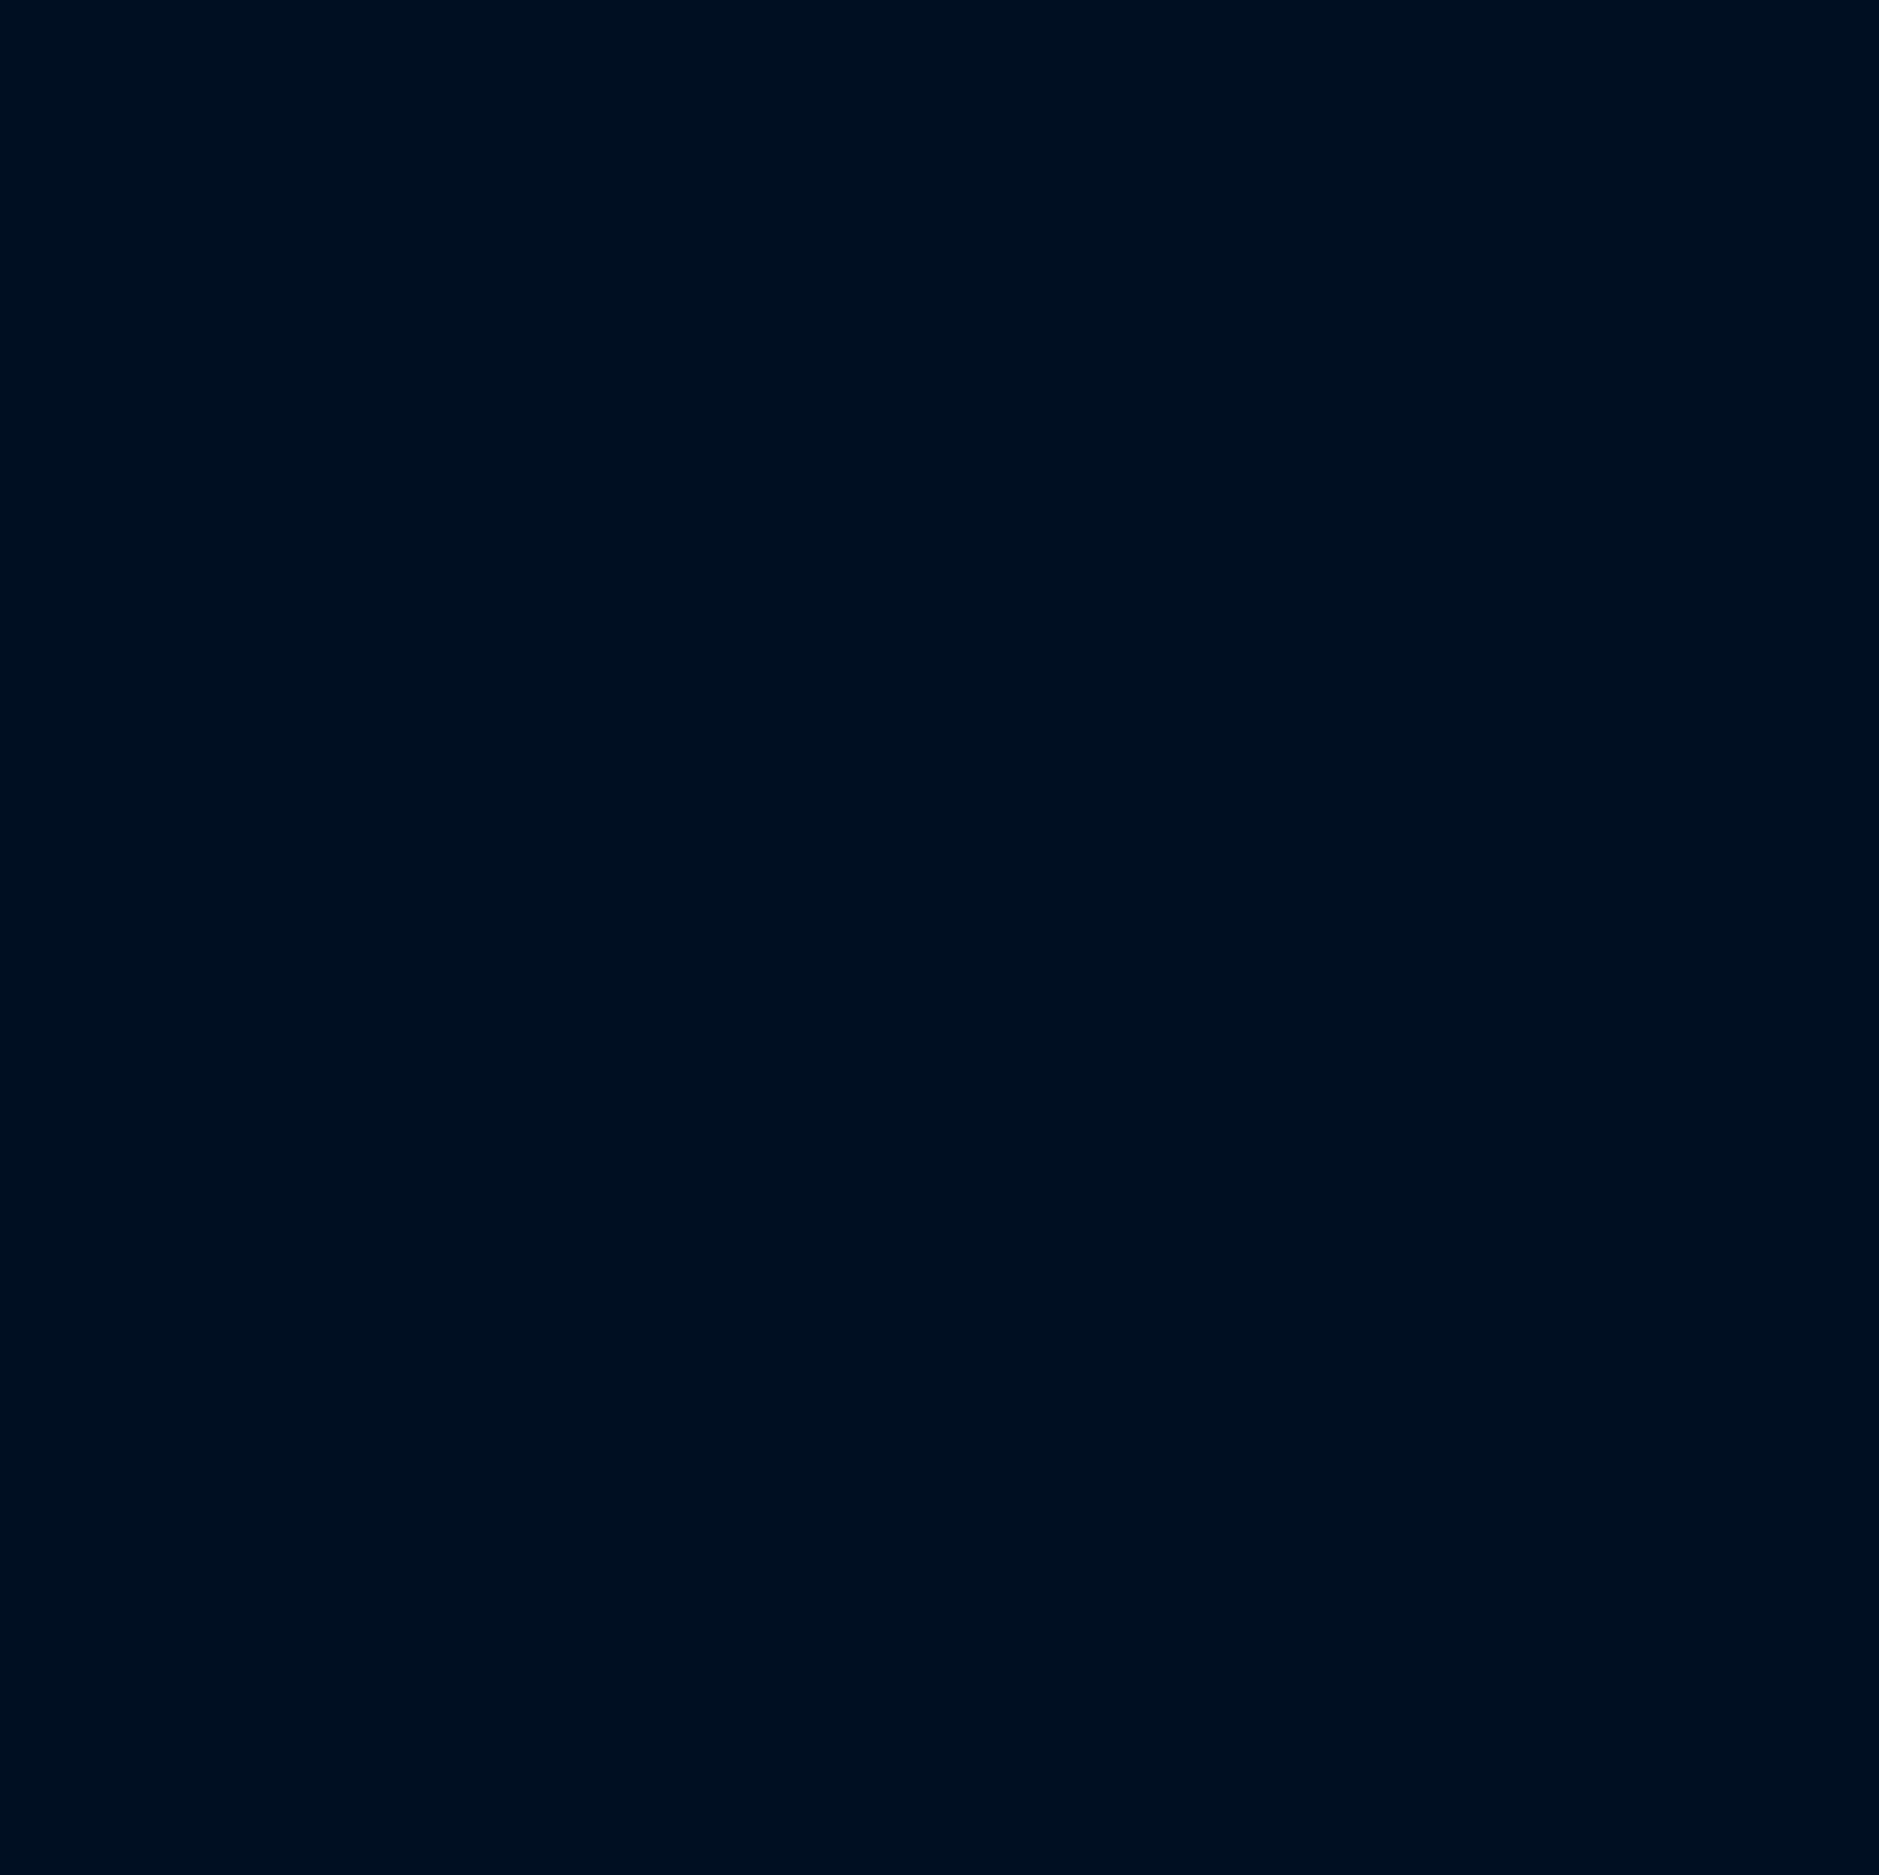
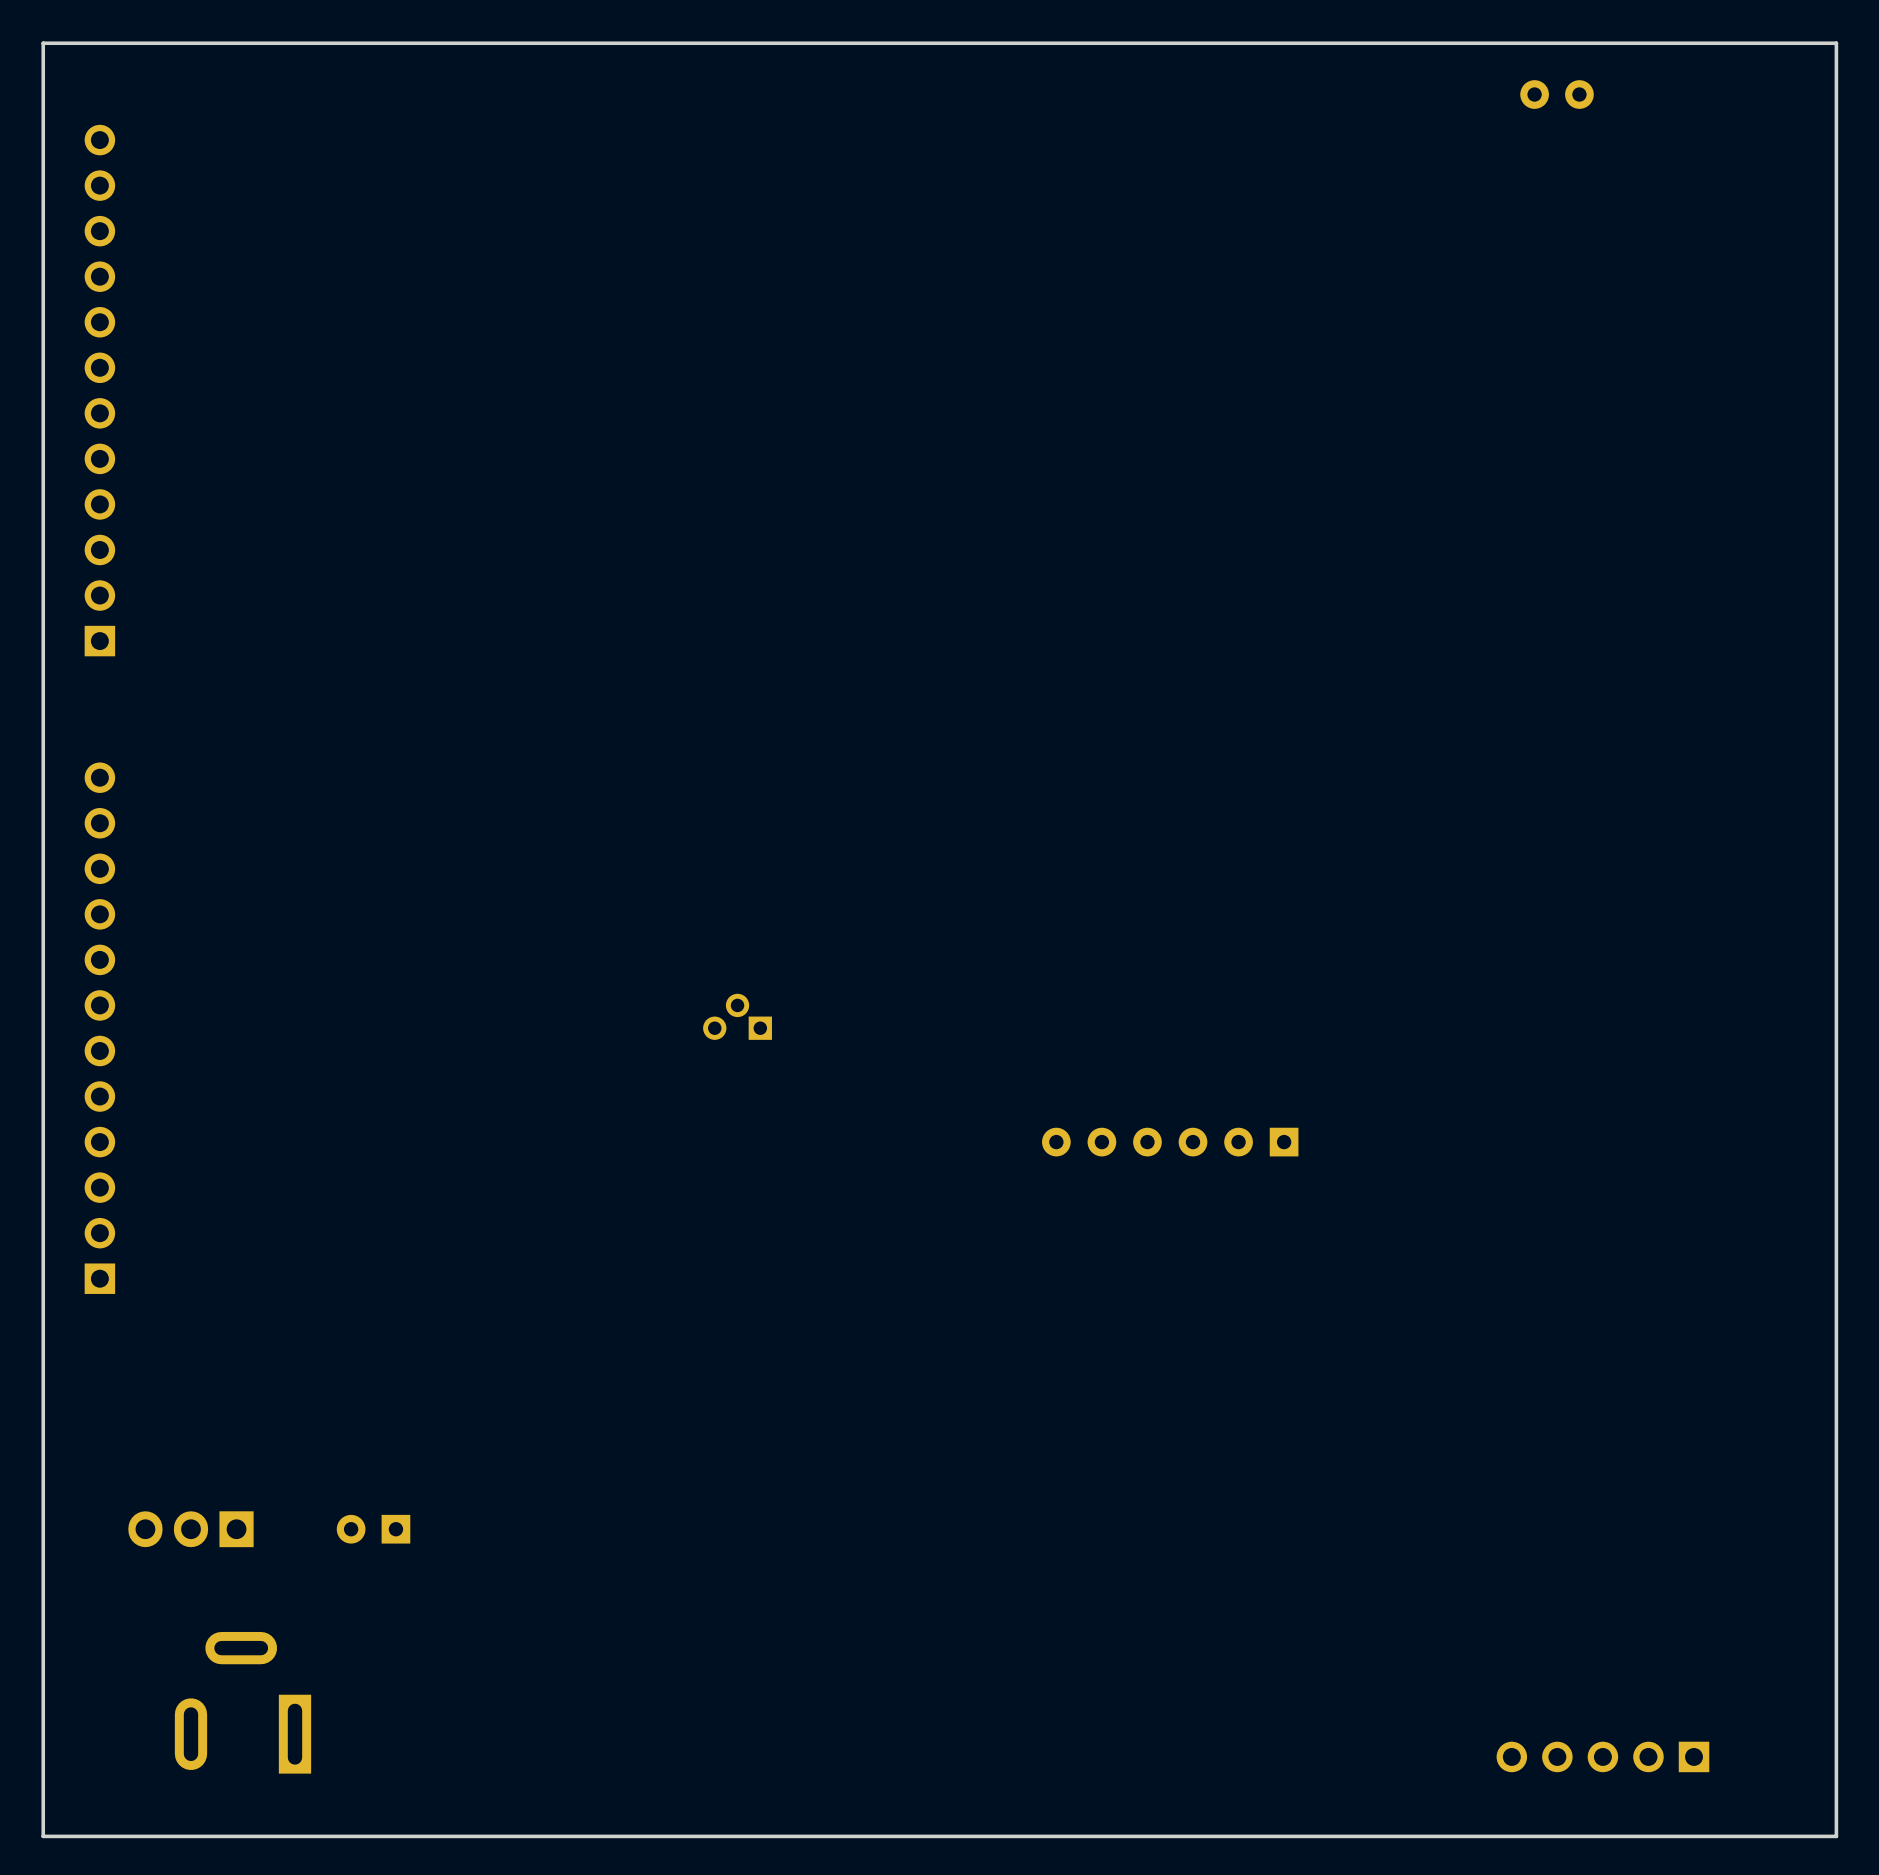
board edge: none -> (1836, 43) (43, 43) (43, 1836) (1836, 1836) (1836, 43)
part: none -> (1557, 94)
part: none -> (99, 390)
part: none -> (737, 1016)
part: none -> (99, 1028)
part: none -> (1170, 1142)
part: none -> (190, 1529)
part: none -> (373, 1529)
part: none -> (242, 1702)
part: none -> (1602, 1756)

